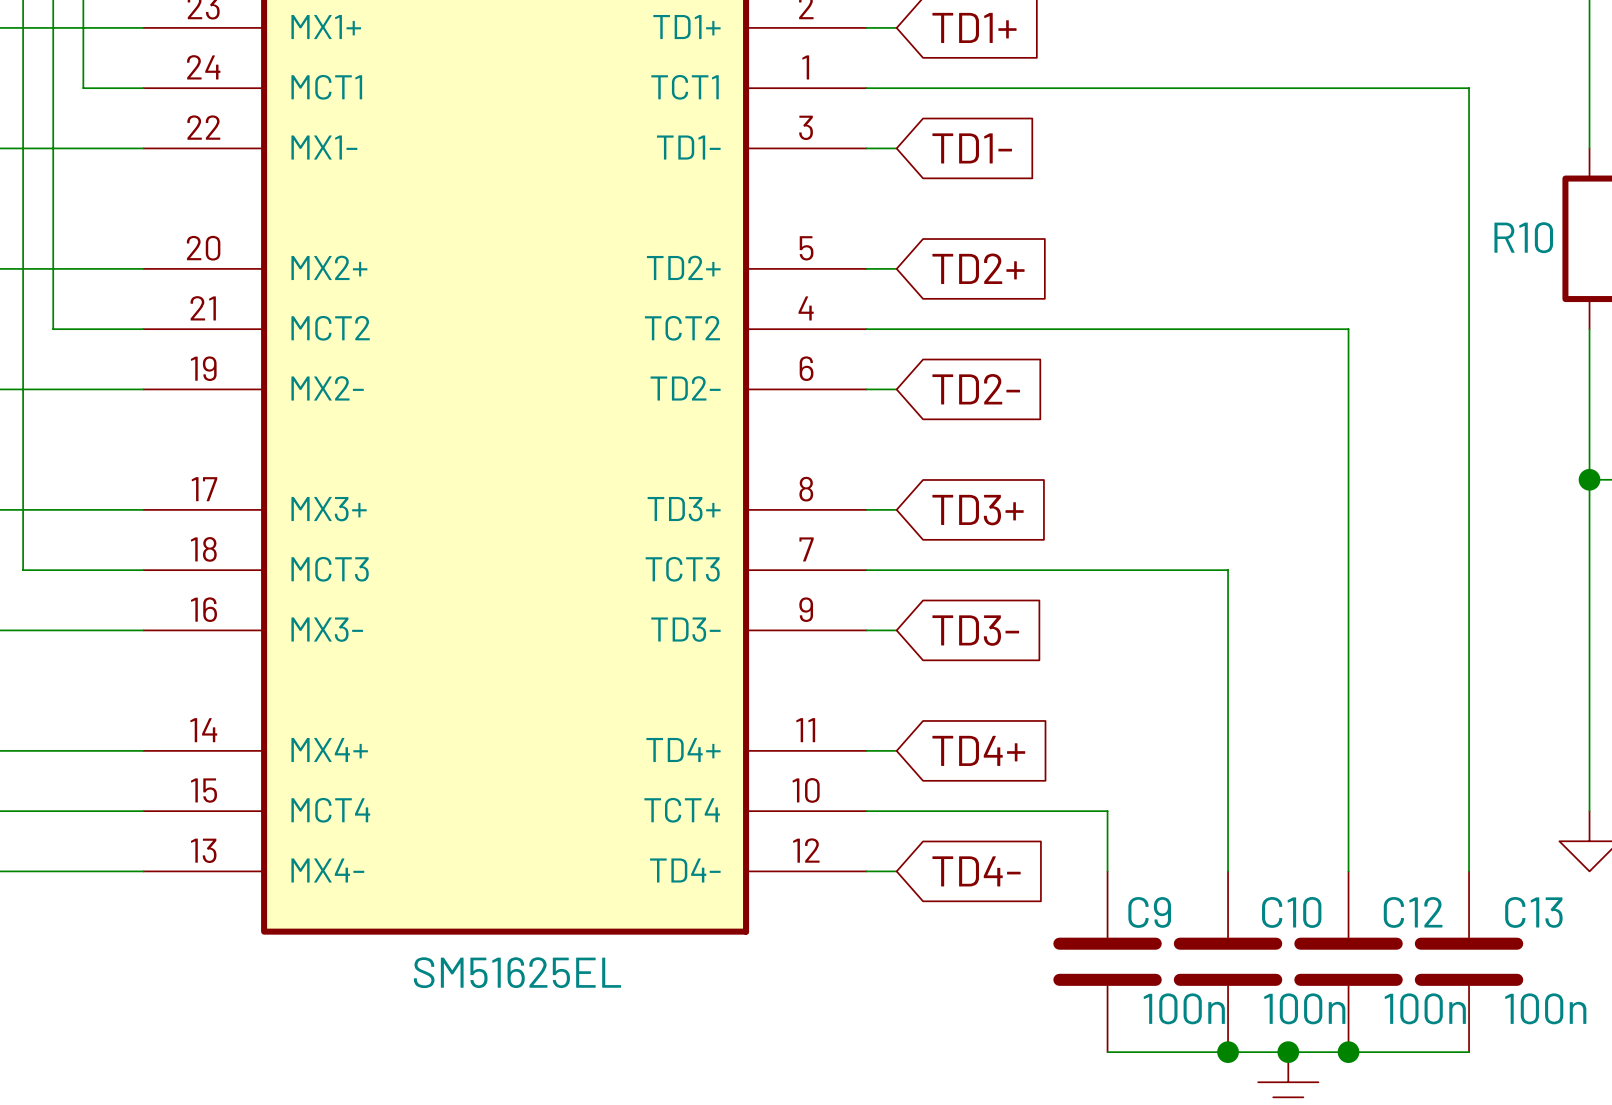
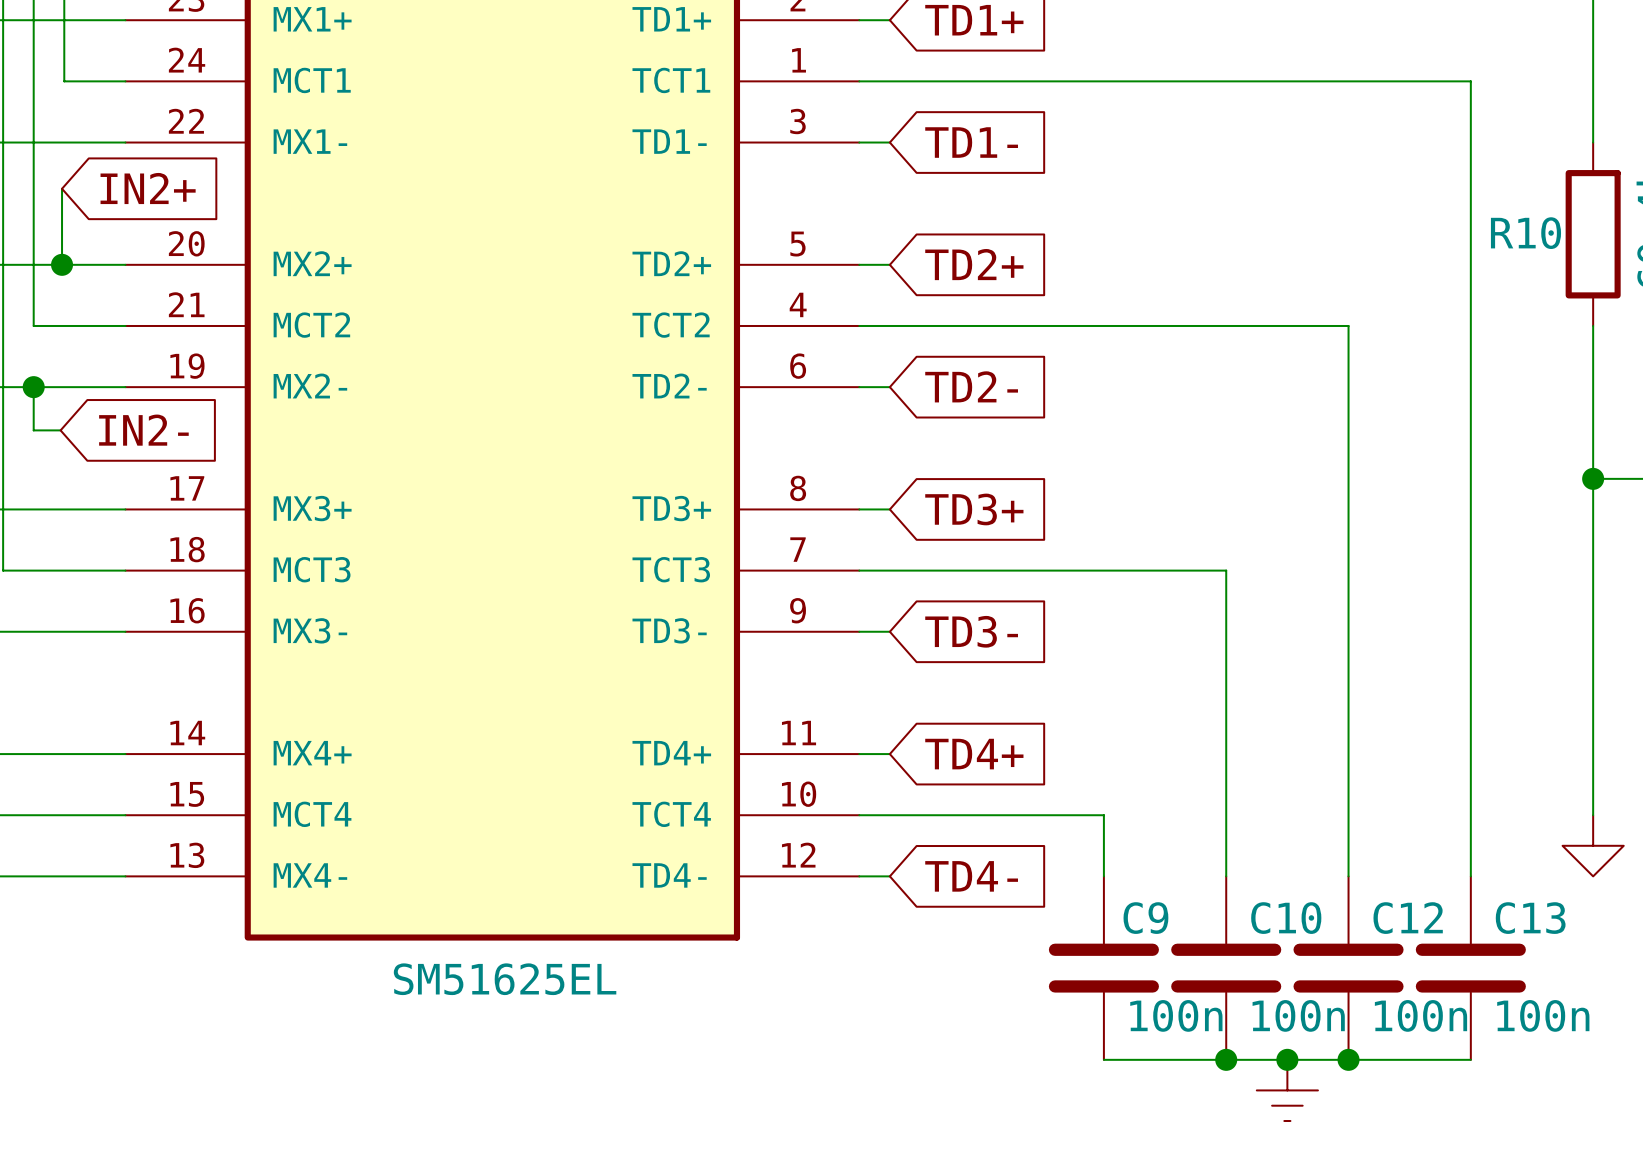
global label: none -> IN2+ (148, 188)
wire: none -> (62, 188) (62, 264)
junction: none -> (62, 264)
wire: none -> (33, 387) (33, 430) (60, 430)
junction: none -> (33, 387)
global label: none -> IN2- (143, 430)

